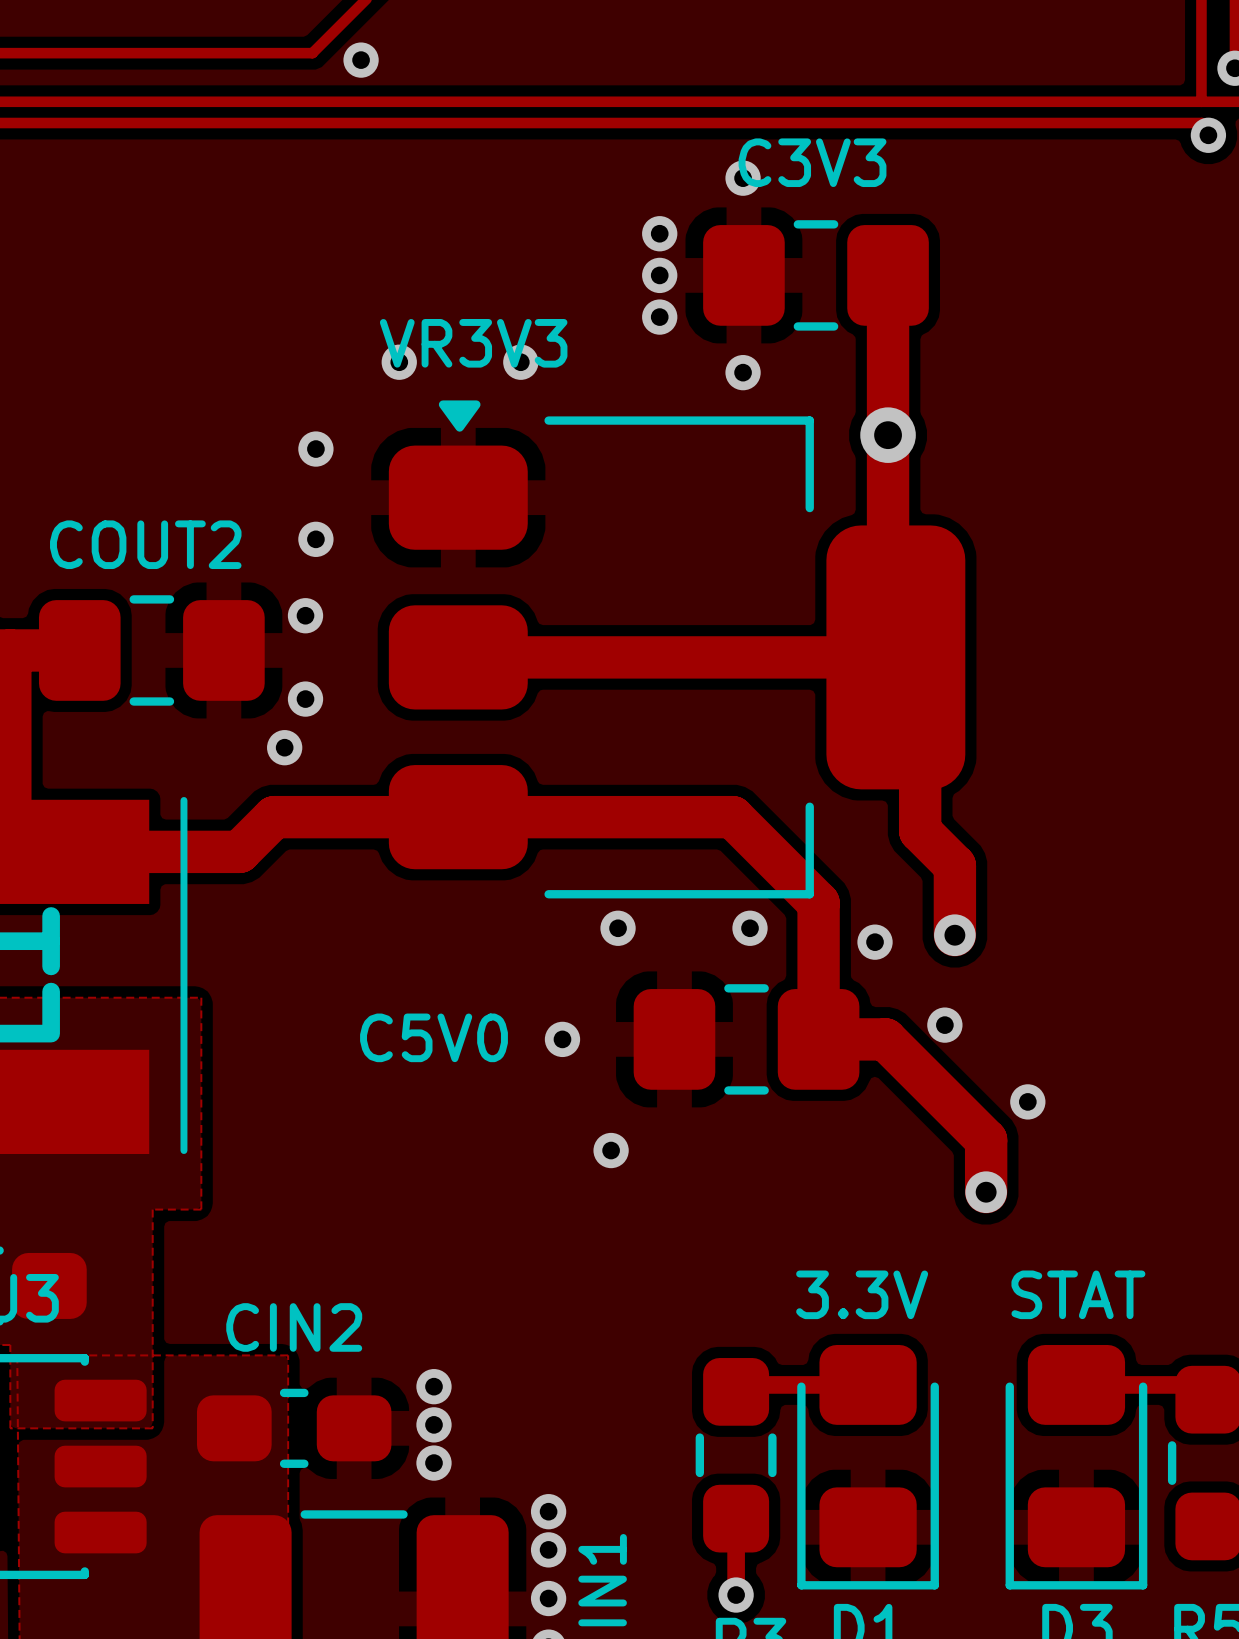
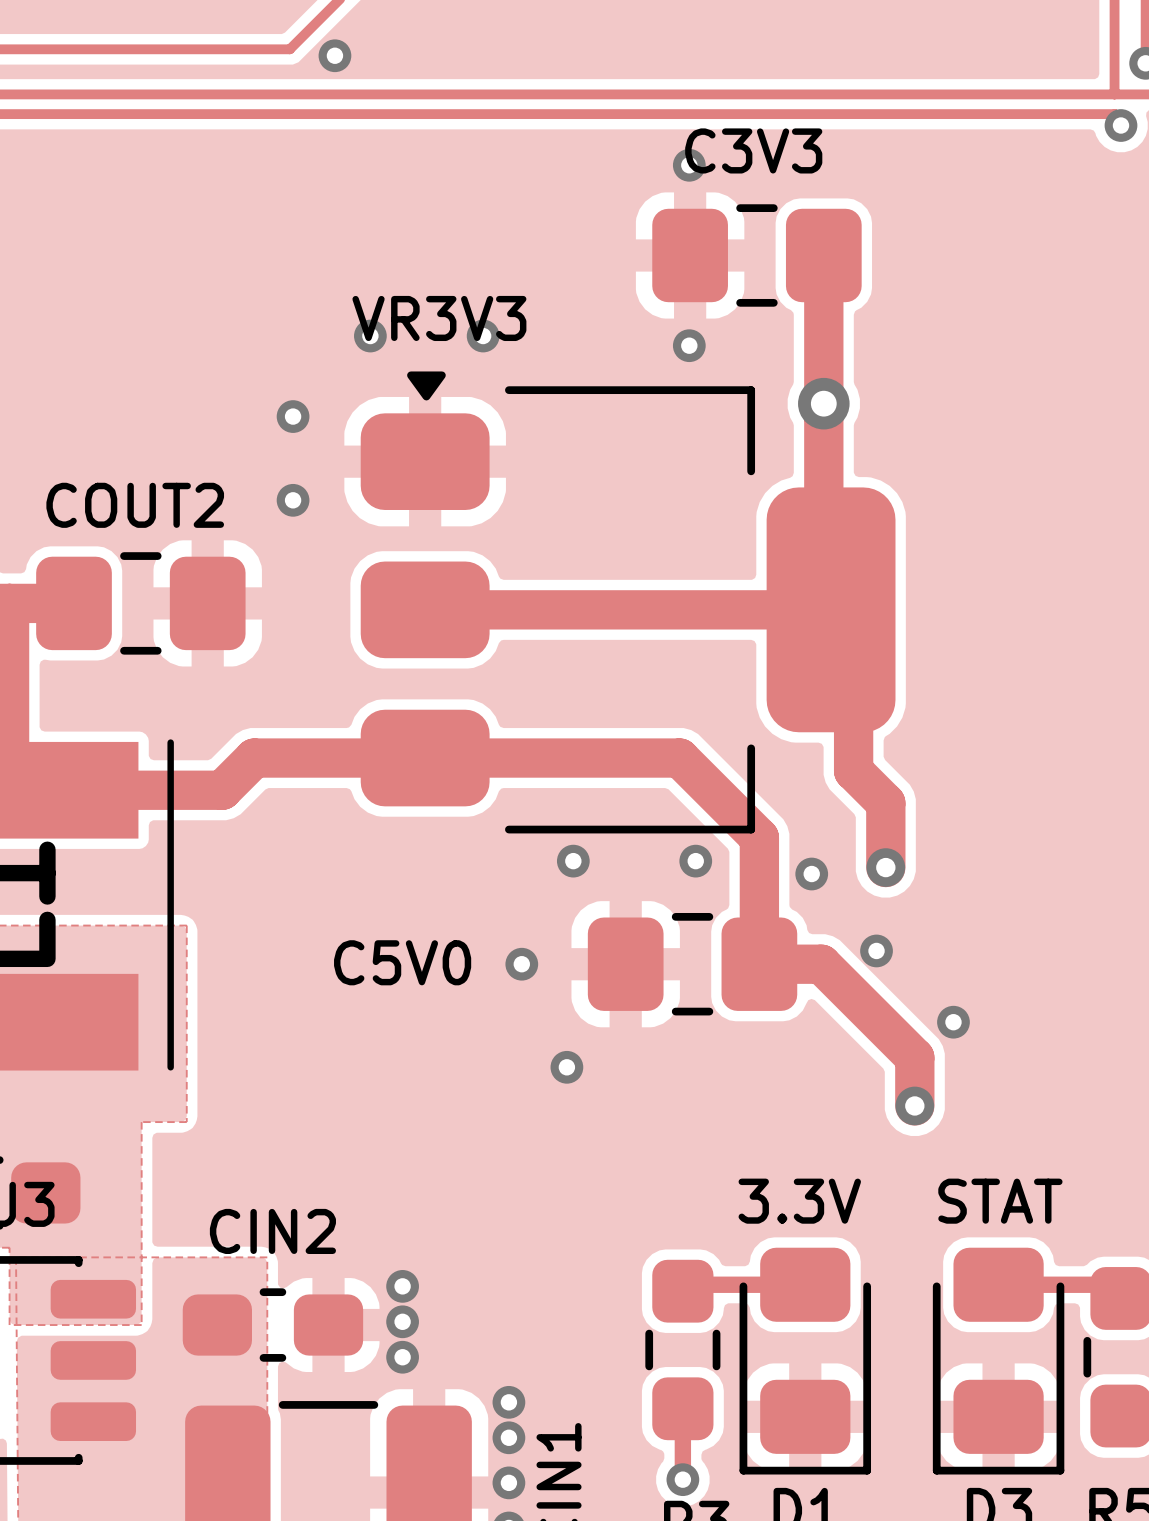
via: (659, 233) -> none
via: (659, 275) -> none
via: (659, 317) -> none
via: (305, 615) -> none
via: (305, 699) -> none
via: (284, 747) -> none

